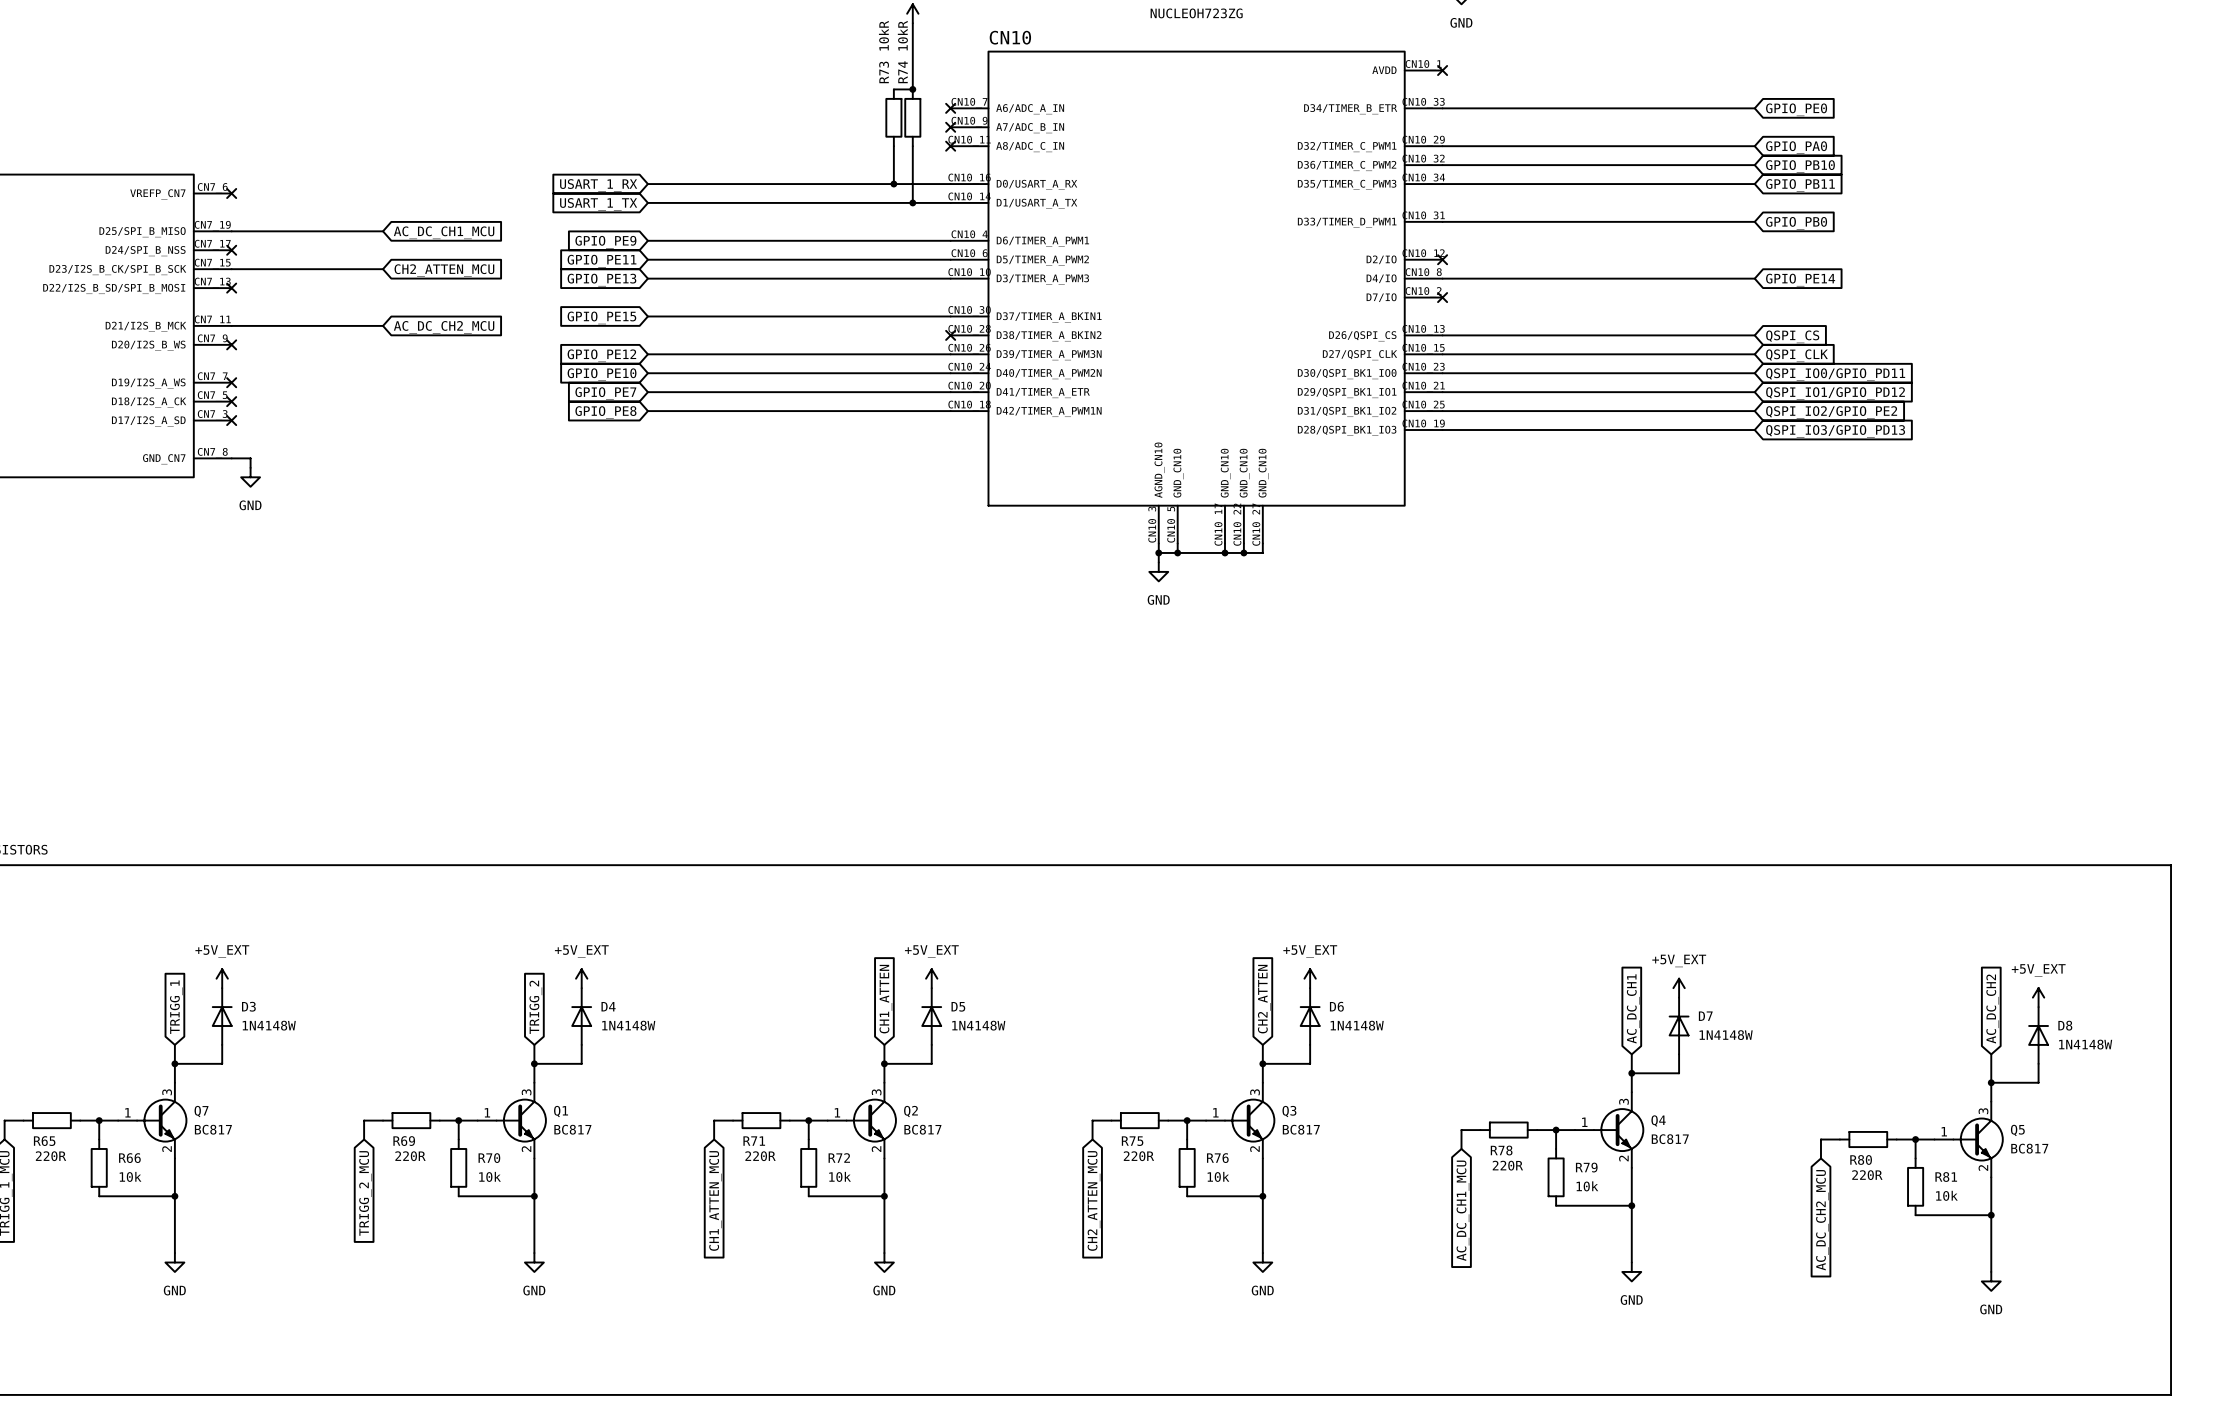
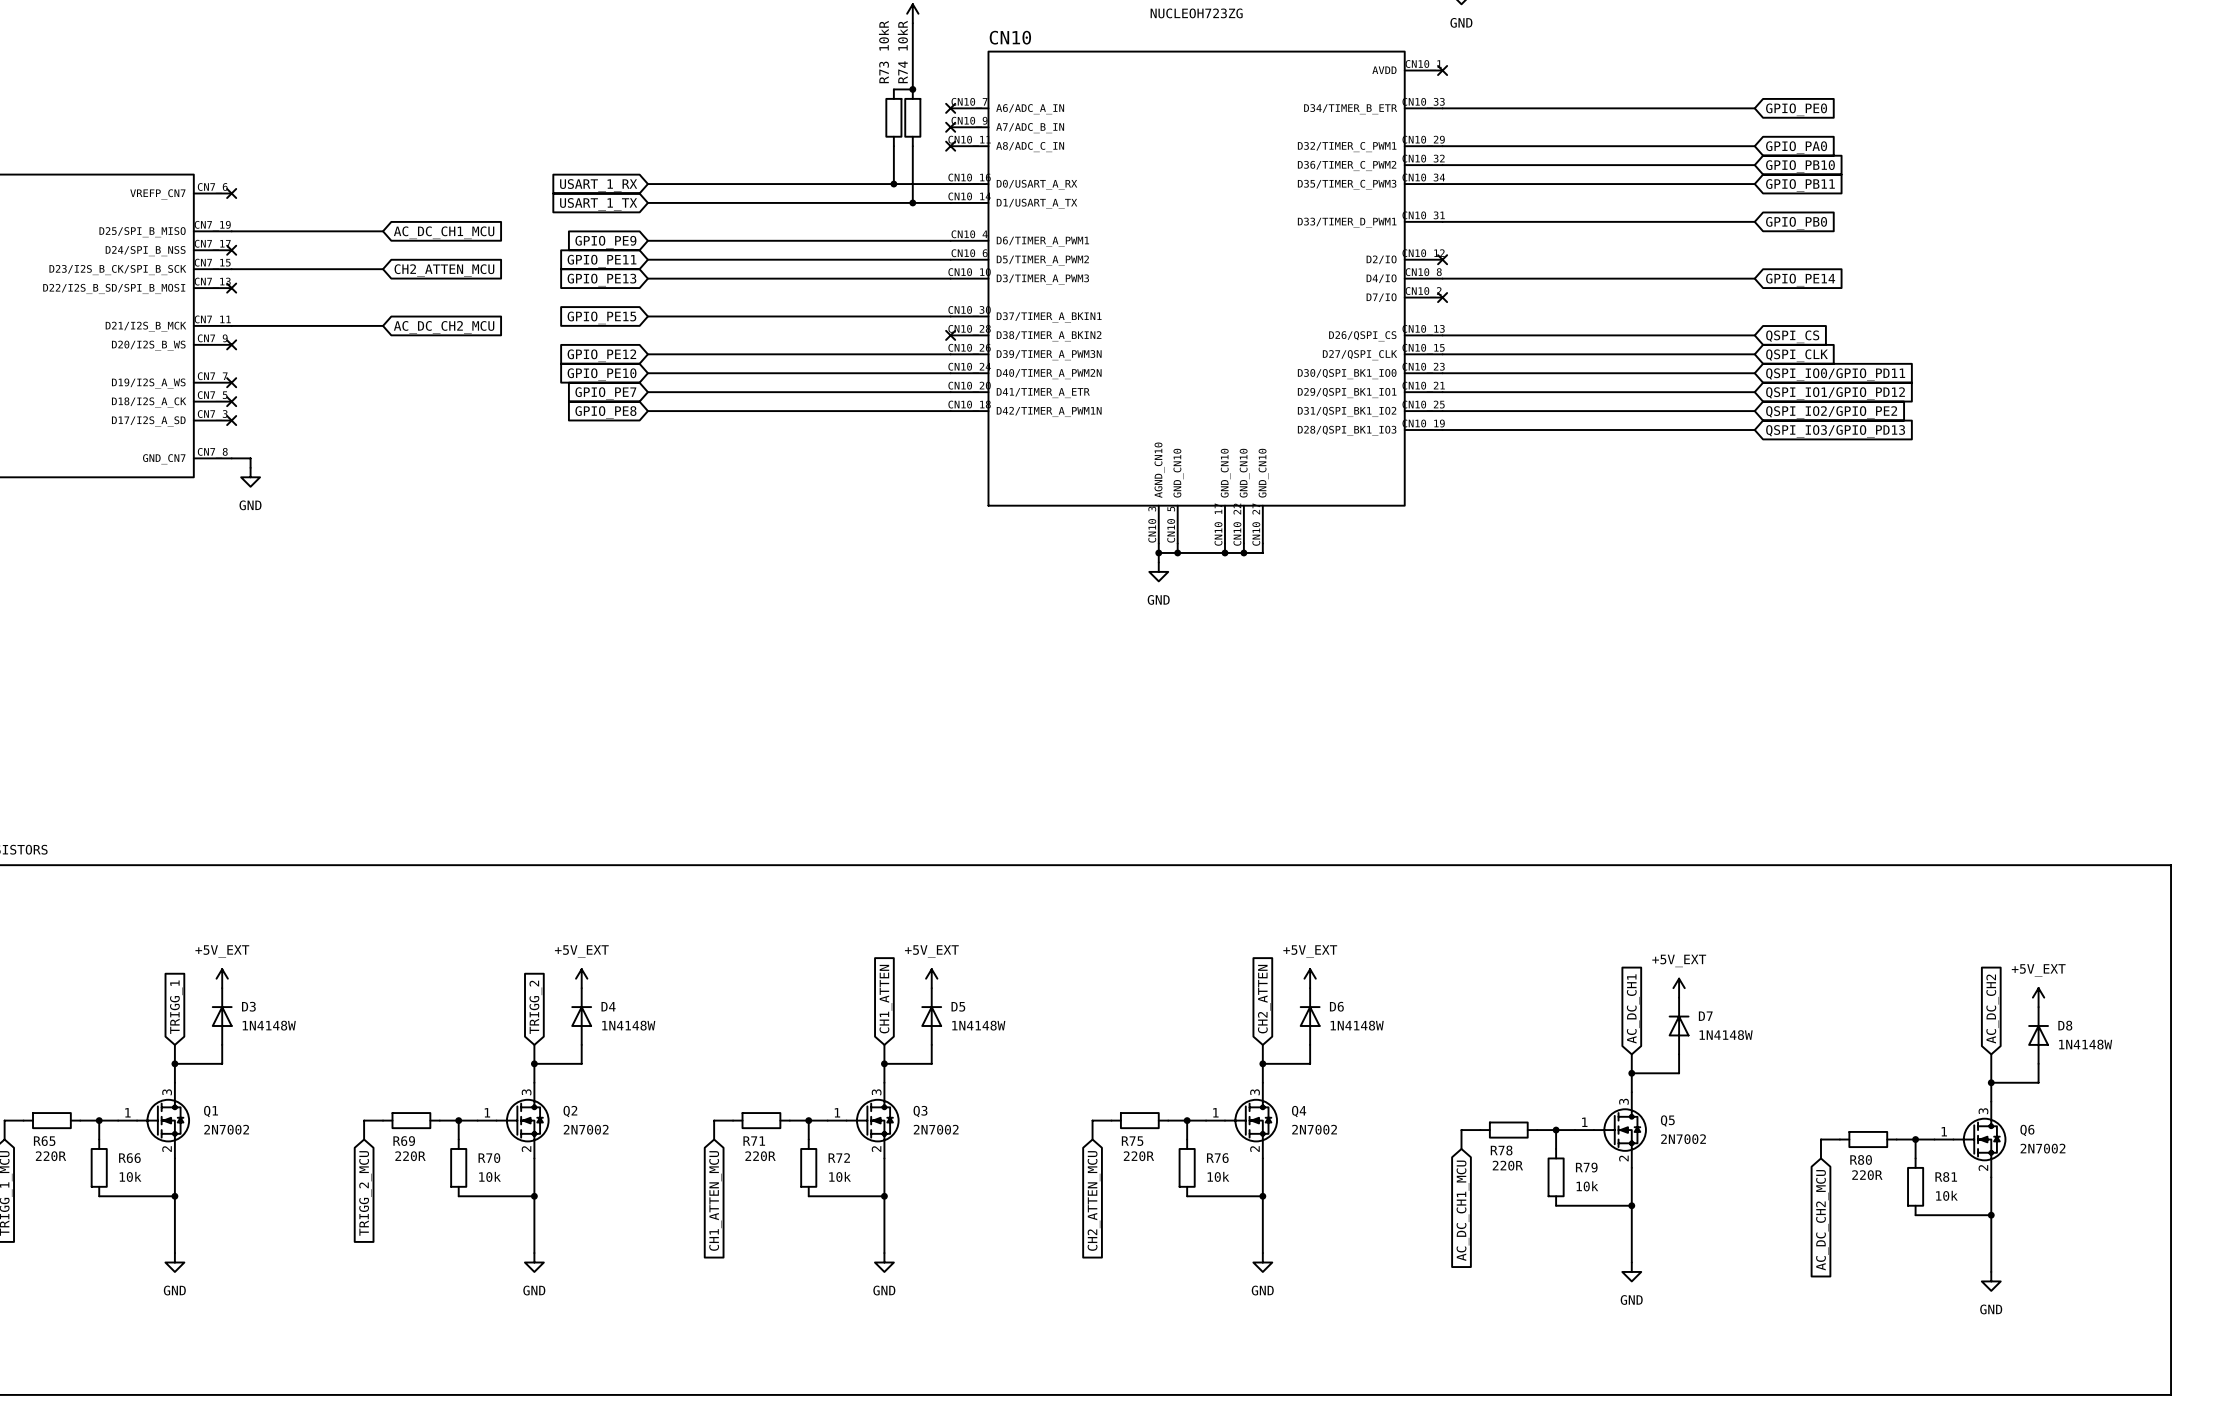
Q1 symbol: [477, 1082, 547, 1159] -> [118, 1082, 191, 1159]
Q2 symbol: [827, 1082, 897, 1159] -> [477, 1082, 550, 1159]
Q3 symbol: [1206, 1082, 1276, 1159] -> [827, 1082, 900, 1159]
Q4 symbol: [1575, 1092, 1645, 1168] -> [1206, 1082, 1278, 1159]
Q5 symbol: [1934, 1101, 2004, 1178] -> [1575, 1092, 1647, 1168]
Q7: BC817 (152, 1120) -> none
Q1 value: BC817 (572, 1129) -> 2N7002 (226, 1129)
Q2 value: BC817 (922, 1129) -> 2N7002 (586, 1129)
Q3 value: BC817 (1301, 1129) -> 2N7002 (936, 1129)
Q4 value: BC817 (1670, 1139) -> 2N7002 (1314, 1129)
Q6: none -> 2N7002 (1970, 1139)
Q5 value: BC817 (2029, 1148) -> 2N7002 (1683, 1139)

